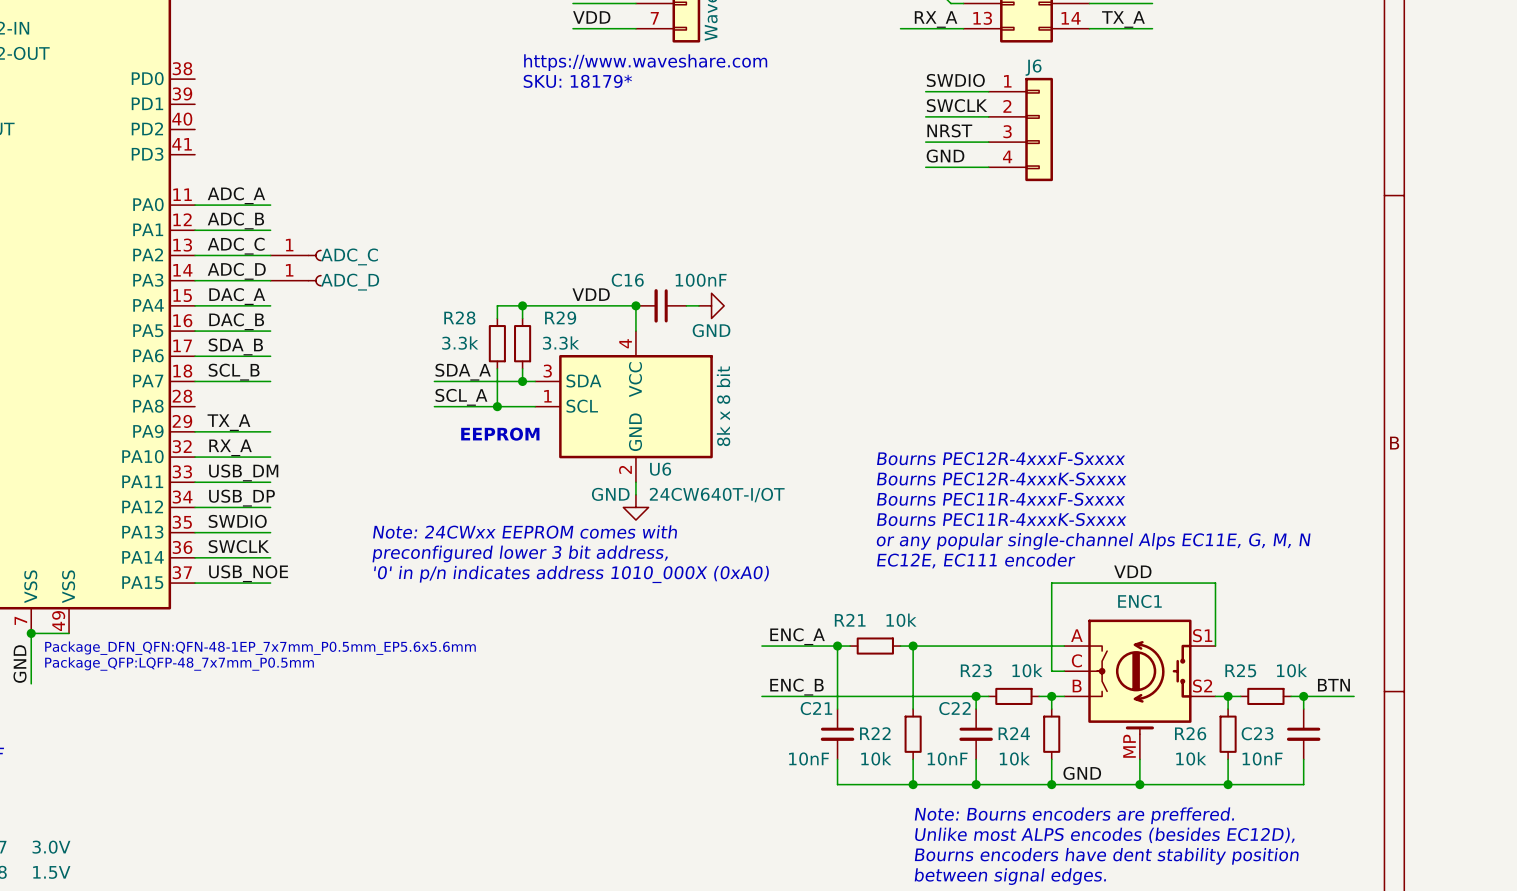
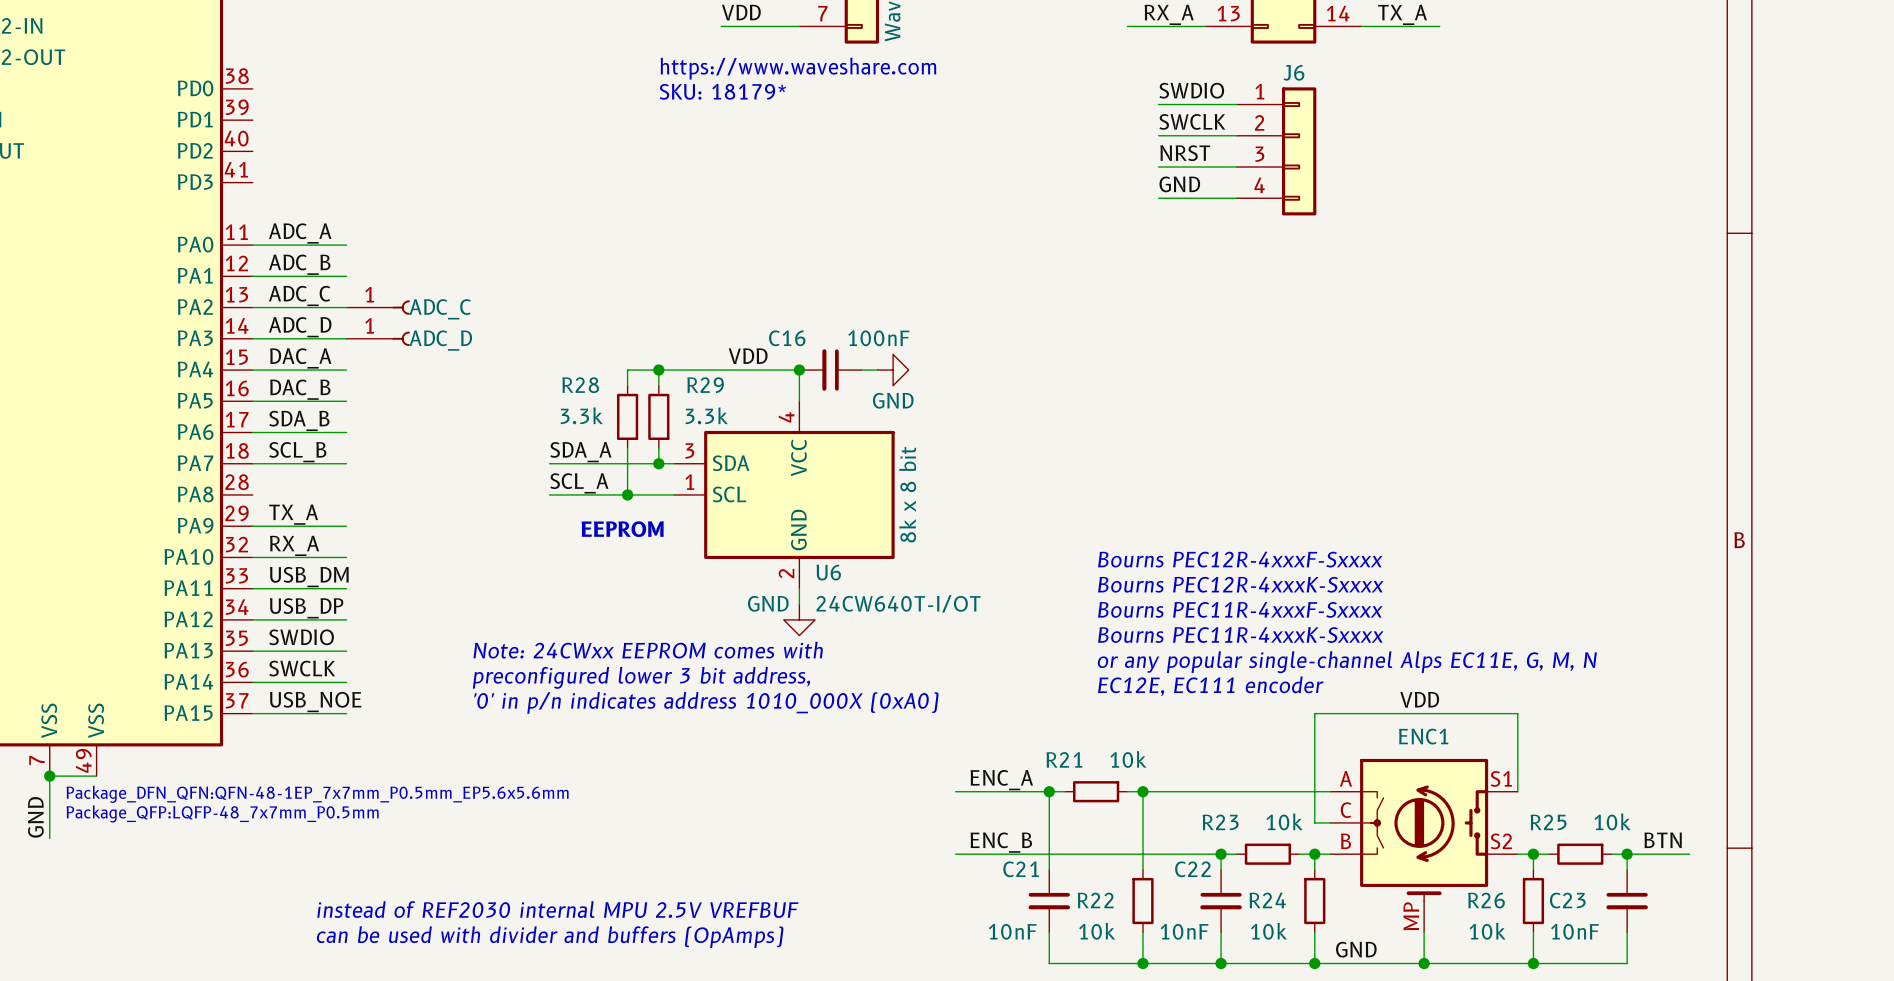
text: none -> instead of REF2030 internal MPU 2.5V VREFBUF (557, 909)
text: none -> can be used with divider and buffers (OpAmps) (550, 937)

